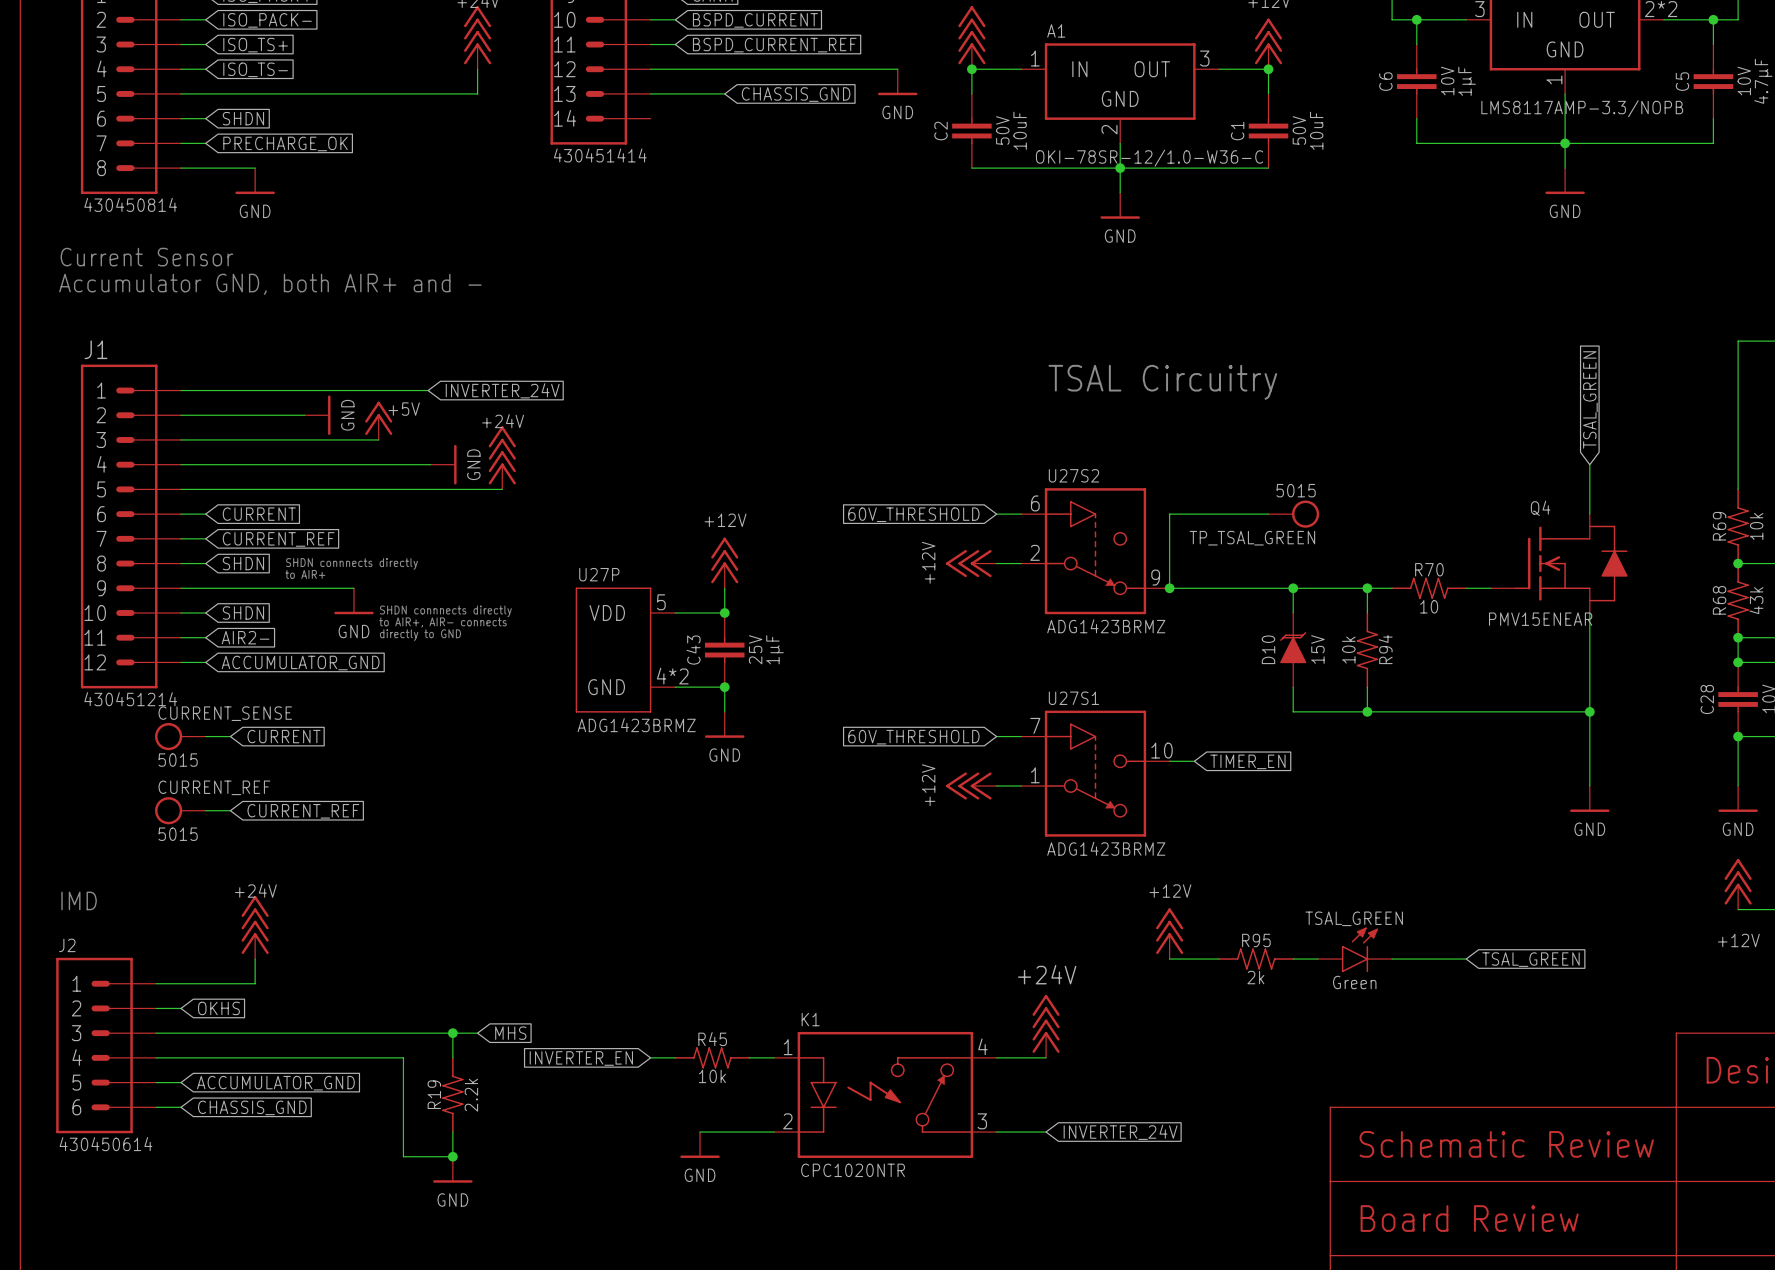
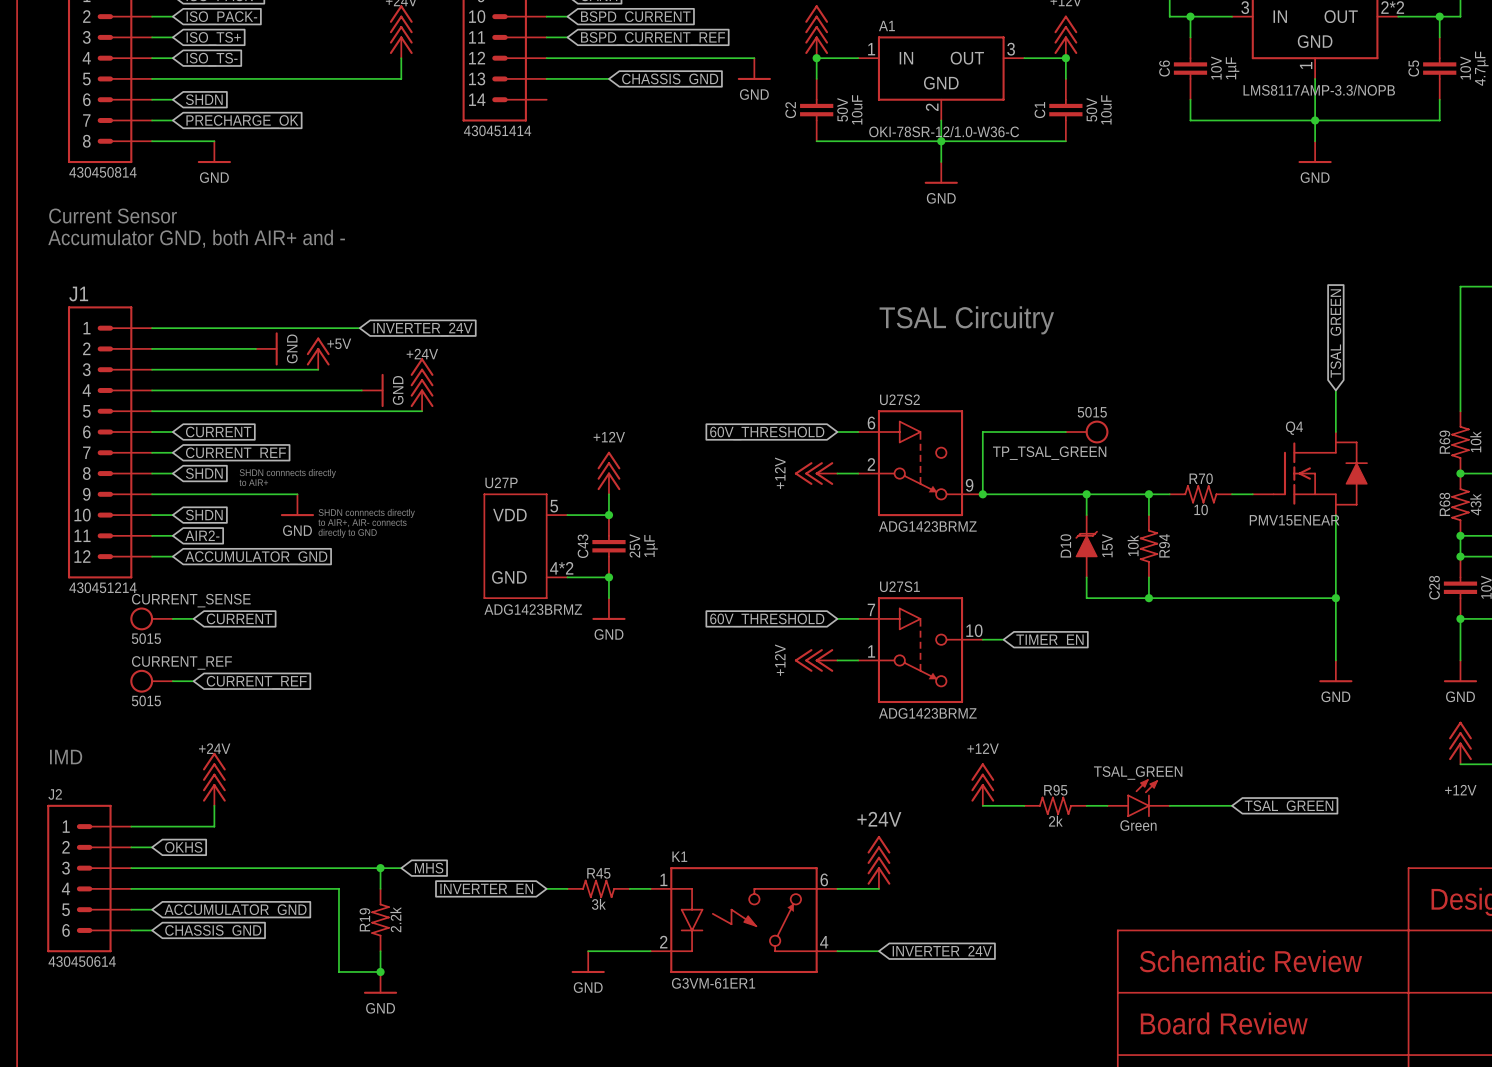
K1 pin number: 4 (982, 1046) -> 6 (824, 879)
R45 text: 10k (712, 1076) -> 3k (598, 904)
K1 pin number: 3 (982, 1121) -> 4 (824, 942)
K1 text: CPC1020NTR (853, 1170) -> G3VM-61ER1 (713, 983)

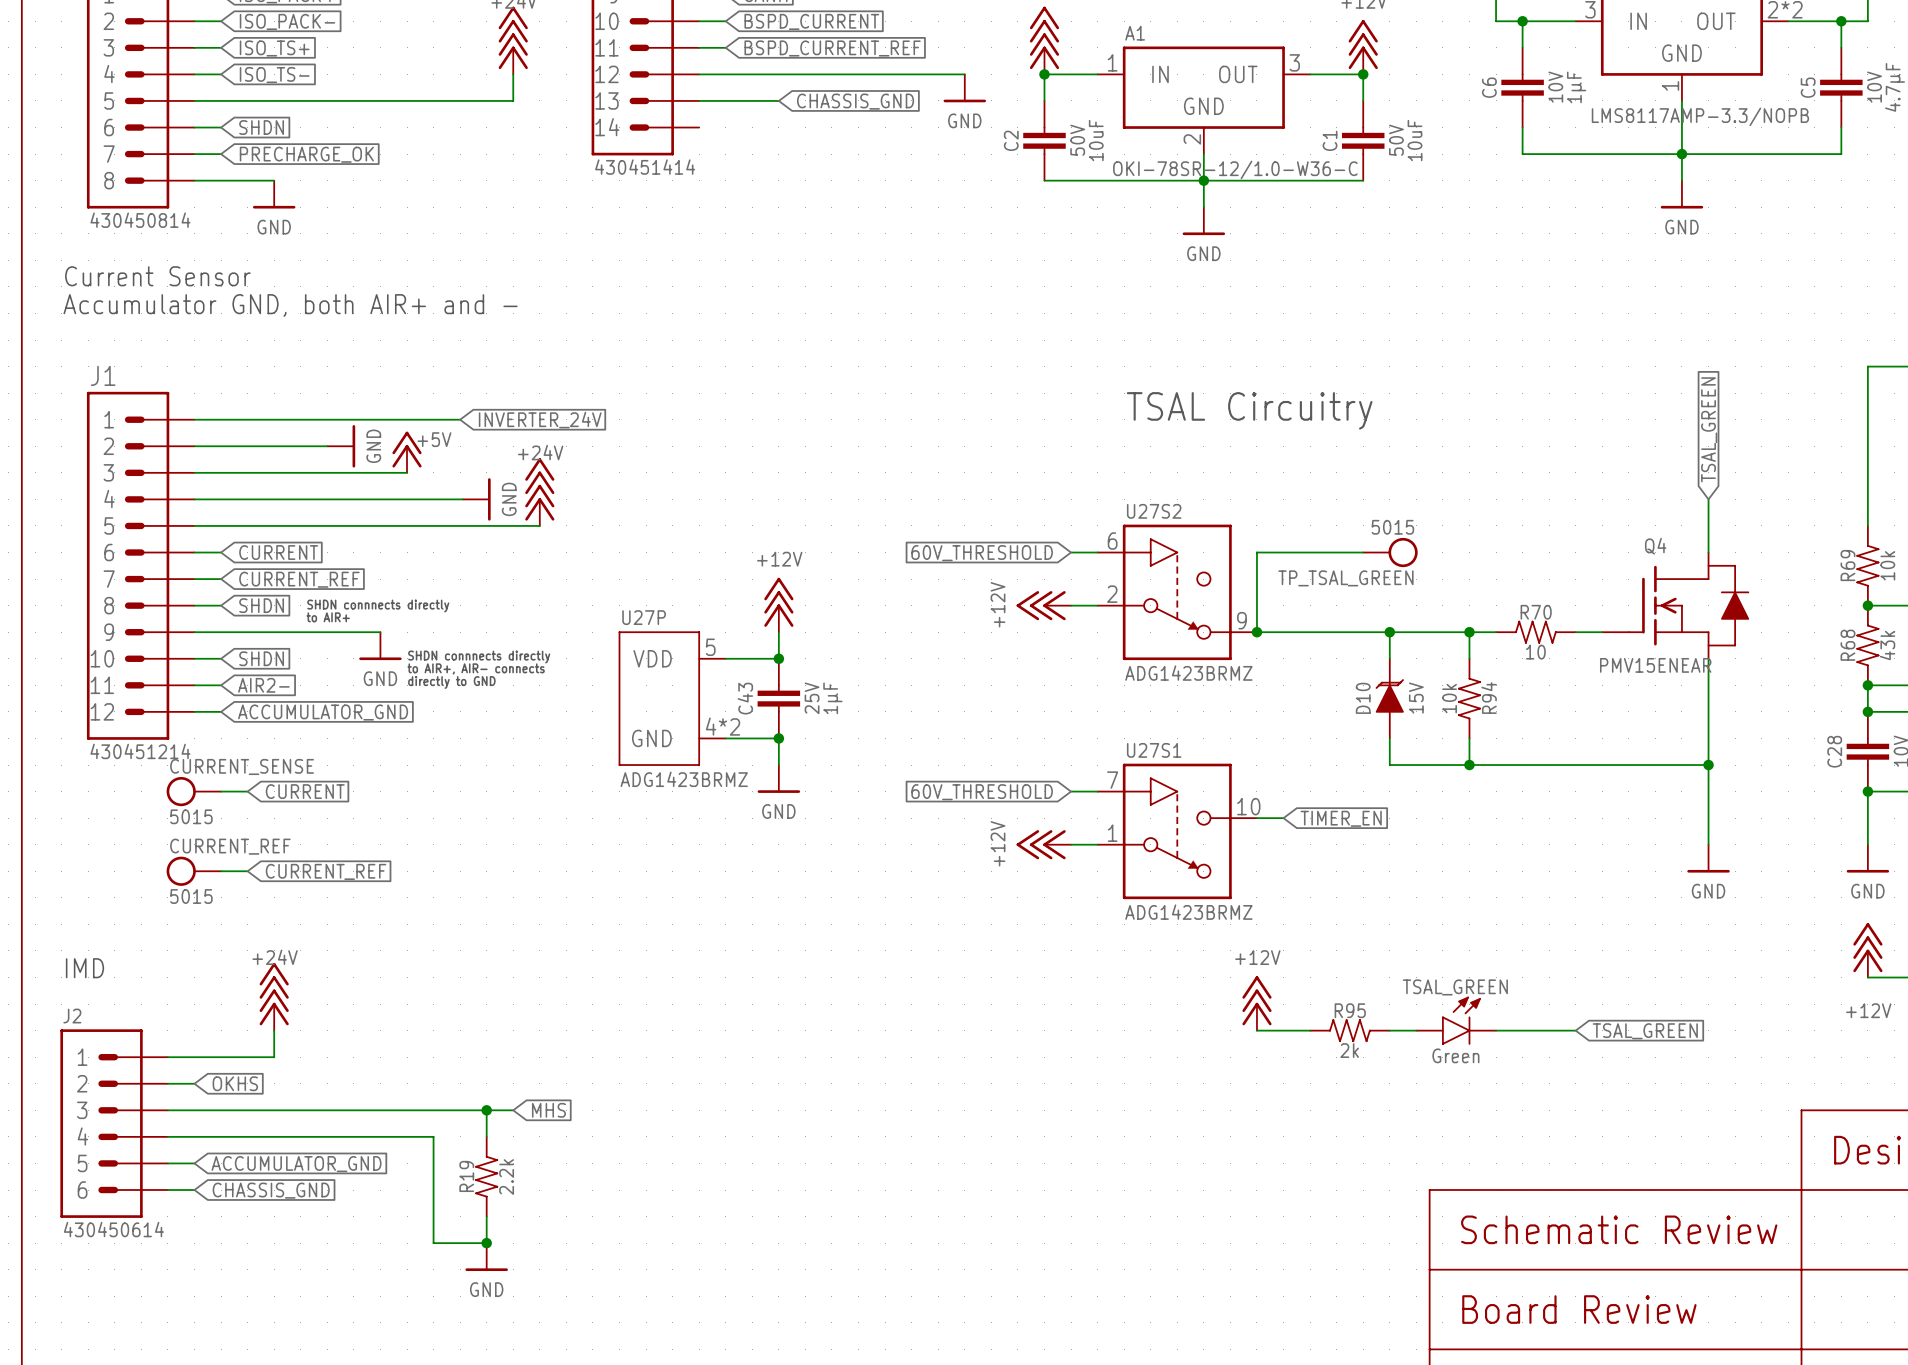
power symbol: +24V (878, 862) -> none
wire: (546, 888) (567, 888) -> none
R45: (598, 888) -> none
wire: (629, 888) (650, 888) -> none
wire: (837, 888) (878, 888) -> none
global label: INVERTER_EN (486, 890) -> none
K1: (743, 920) -> none
wire: (588, 951) (650, 951) -> none
wire: (837, 951) (878, 951) -> none
global label: INVERTER_24V (942, 952) -> none
power symbol: GND (588, 962) -> none

